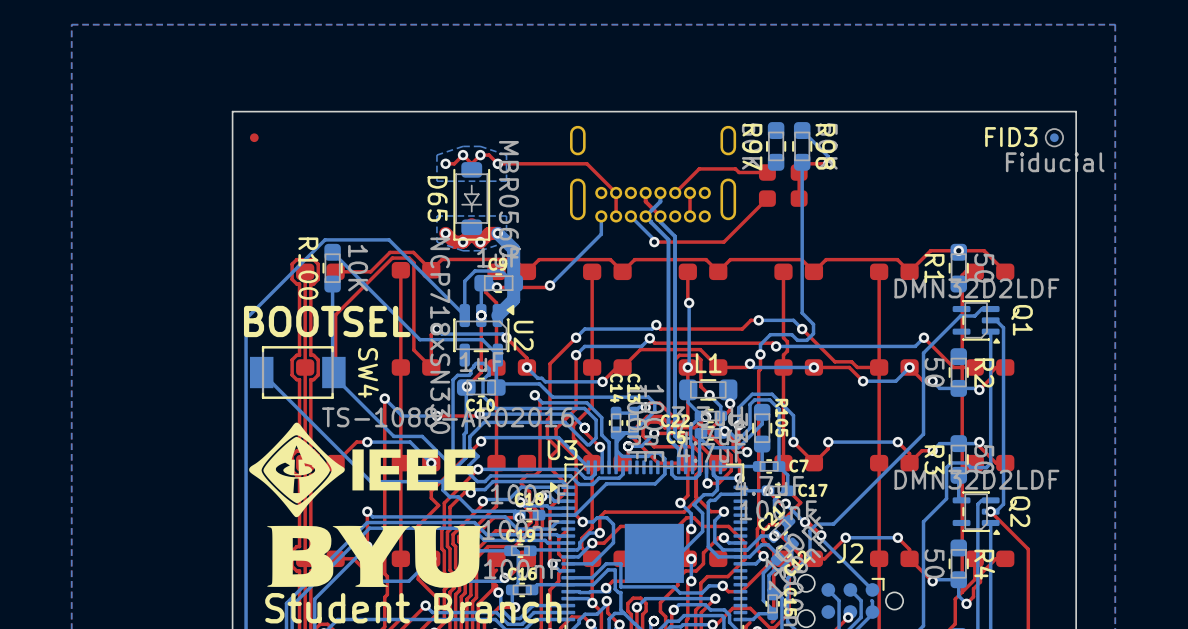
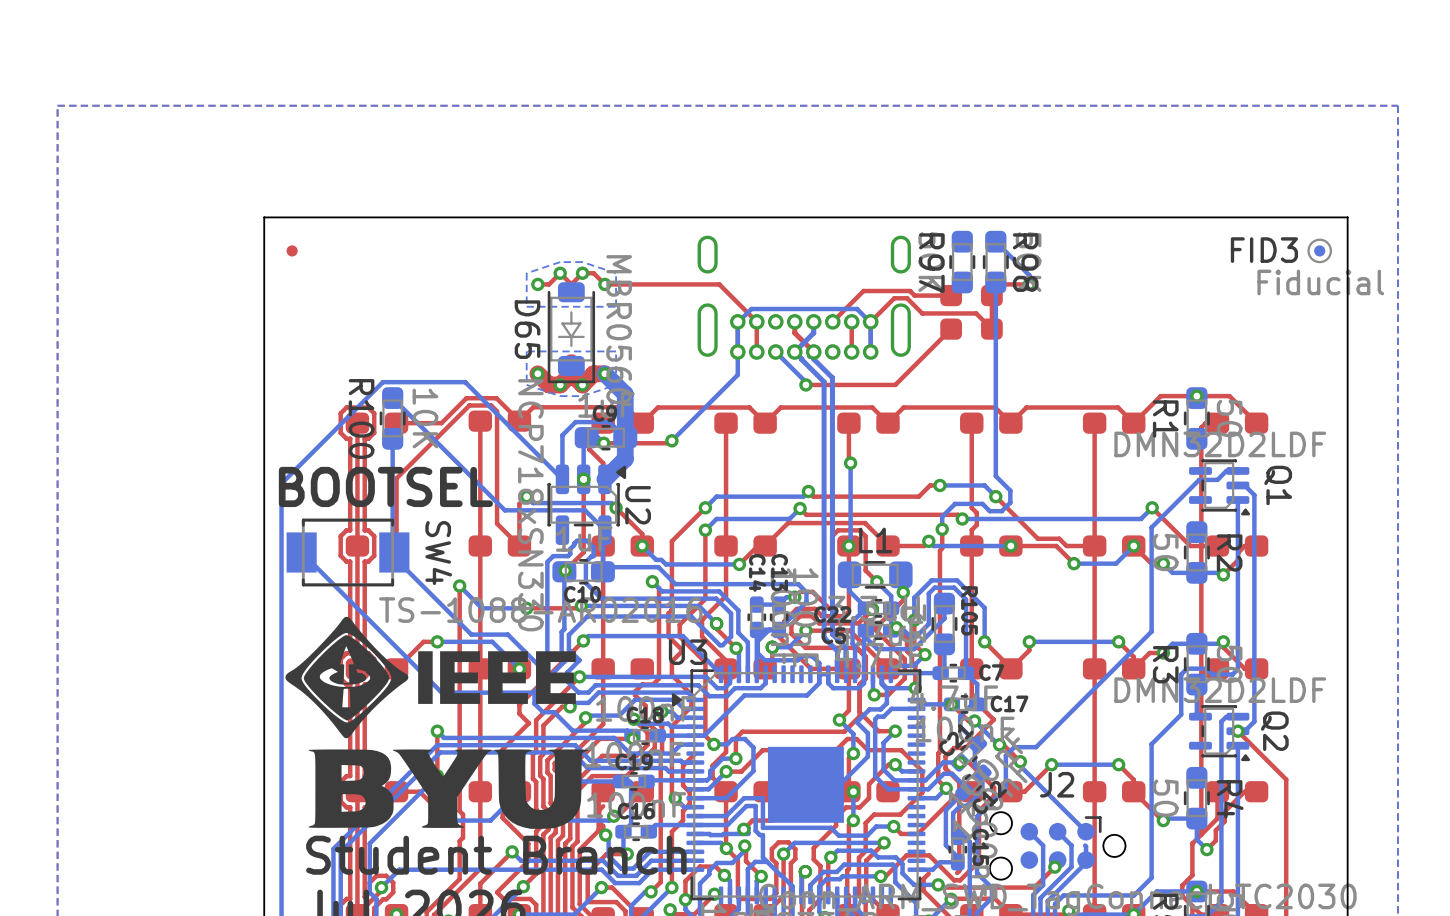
top track: none -> (991, 329) (976, 313) (922, 313) (907, 298) (894, 298) (870, 321) (870, 352)
bottom track: none -> (870, 352) (870, 322) (857, 309) (751, 309) (737, 322) (737, 352)
bottom track: none -> (925, 654) (913, 665) (898, 665)

